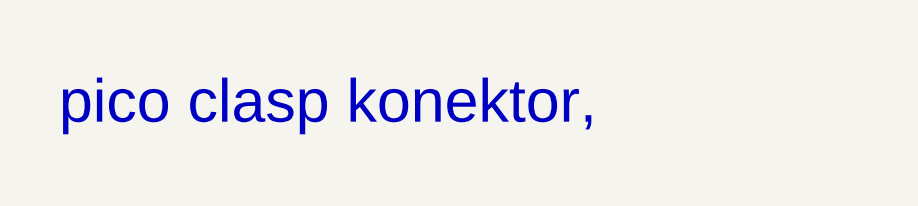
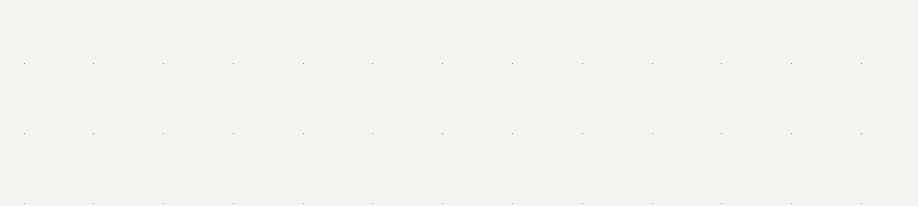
text: pico clasp konektor, (327, 105) -> none

